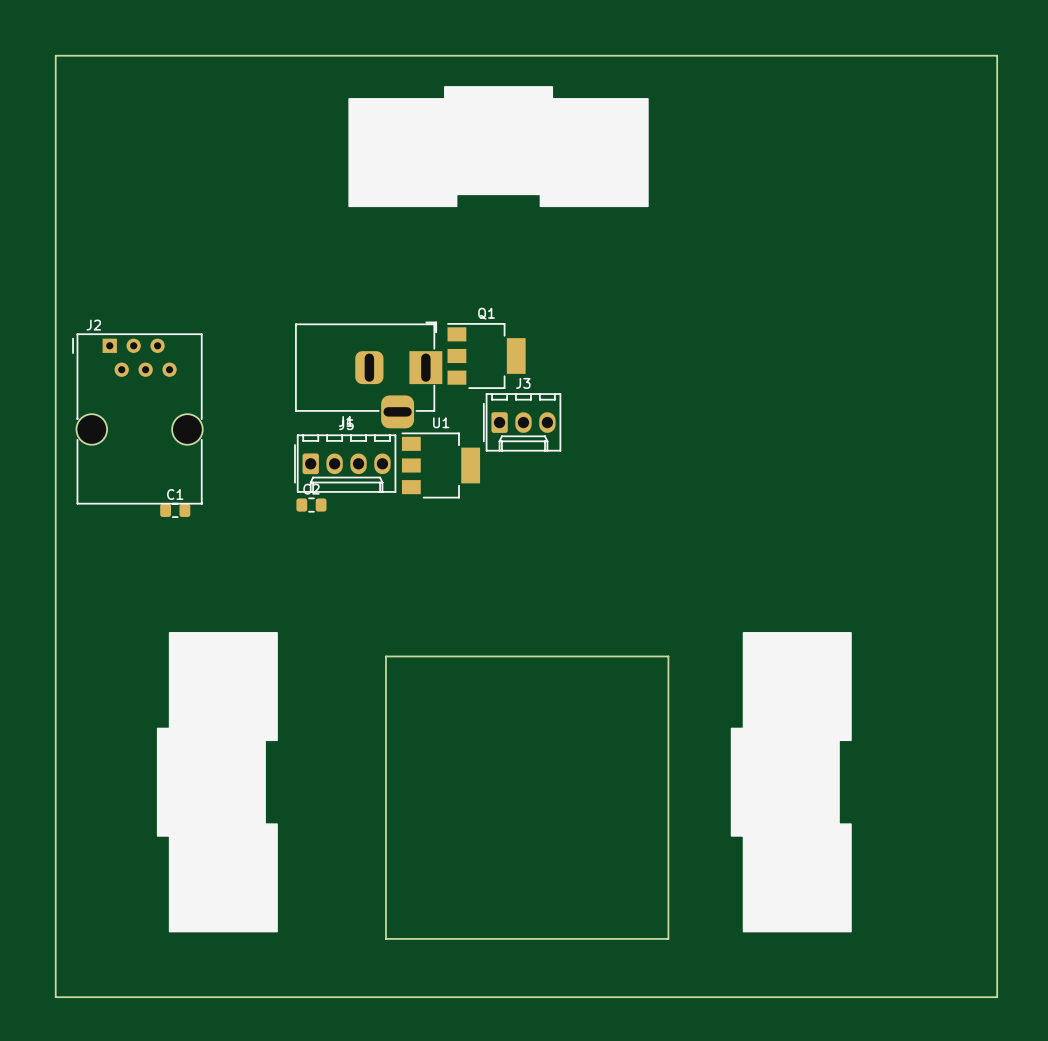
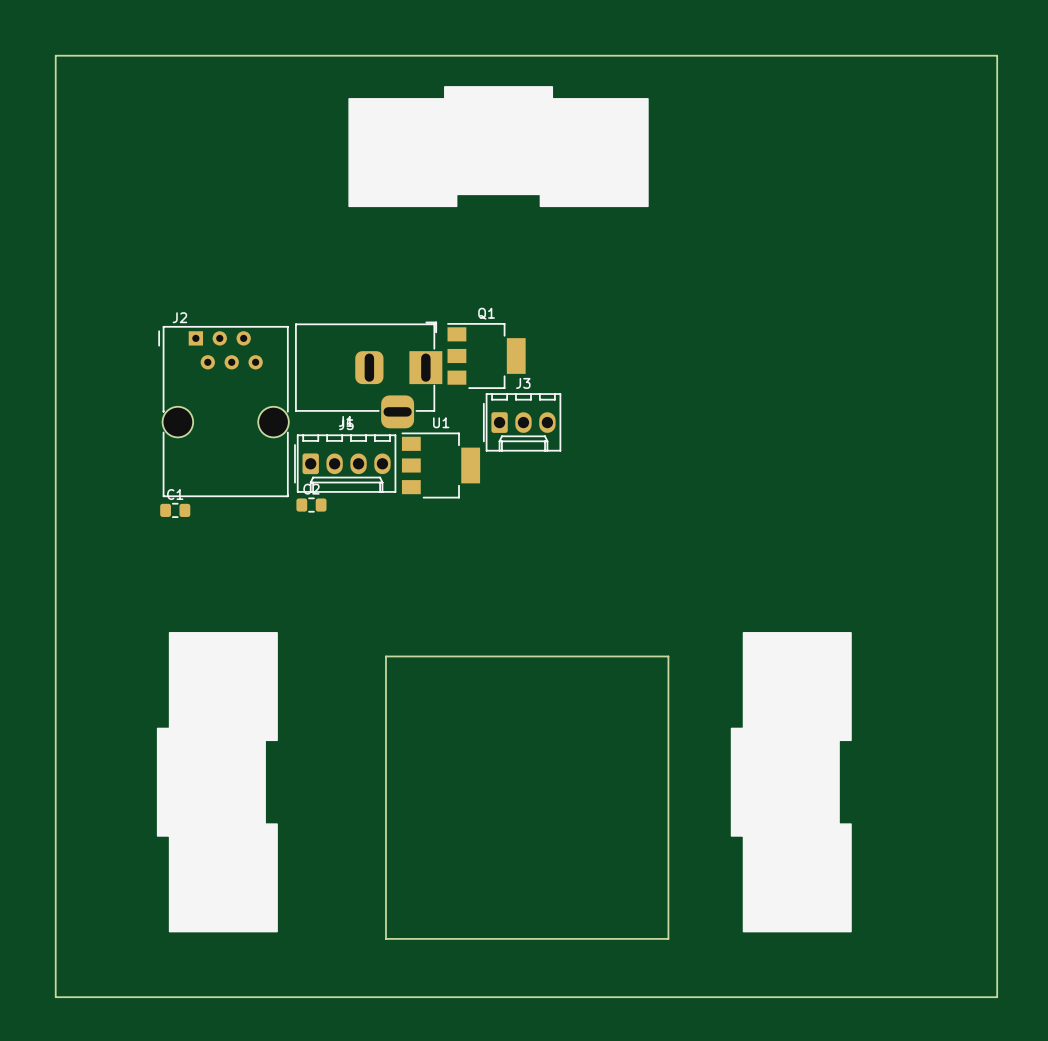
J2 position: (137, 418) -> (223, 411)

